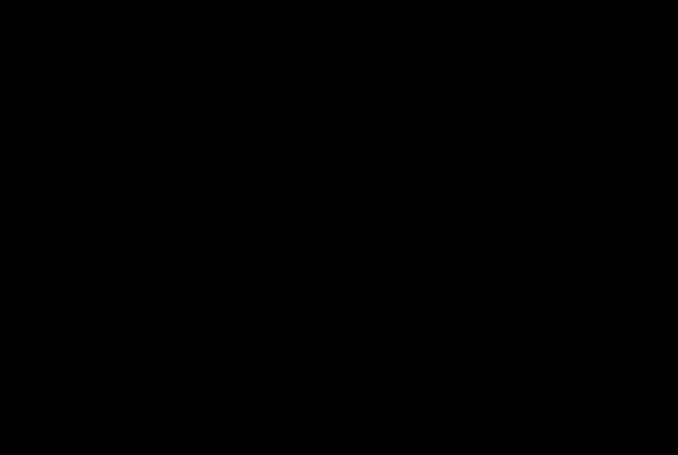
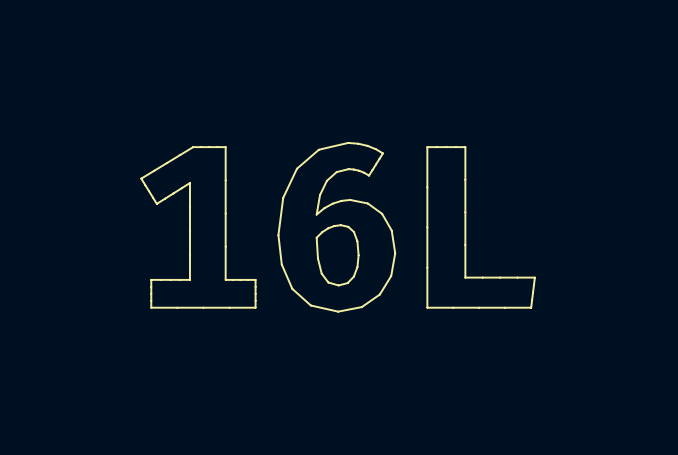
line: none -> (348, 142) (367, 145) (382, 153) (369, 175) (359, 170) (348, 169) (336, 172) (326, 180) (320, 195) (316, 214) (324, 208) (341, 200) (350, 199) (367, 203) (382, 213) (391, 230) (395, 253) (391, 275) (379, 294) (361, 307) (338, 311) (310, 305) (292, 288) (281, 264) (278, 235) (283, 197) (296, 168) (318, 149) (348, 142)
line: none -> (193, 147) (225, 147) (225, 279) (255, 279) (255, 307) (151, 307) (151, 279) (189, 279) (189, 183) (156, 203) (141, 178) (193, 147)
line: none -> (427, 147) (427, 307) (531, 307) (534, 277) (465, 277) (465, 147) (427, 147)
line: none -> (340, 225) (328, 228) (316, 237) (317, 258) (321, 273) (328, 282) (338, 285) (347, 283) (353, 276) (358, 255) (357, 241) (353, 232) (348, 226) (340, 225)

